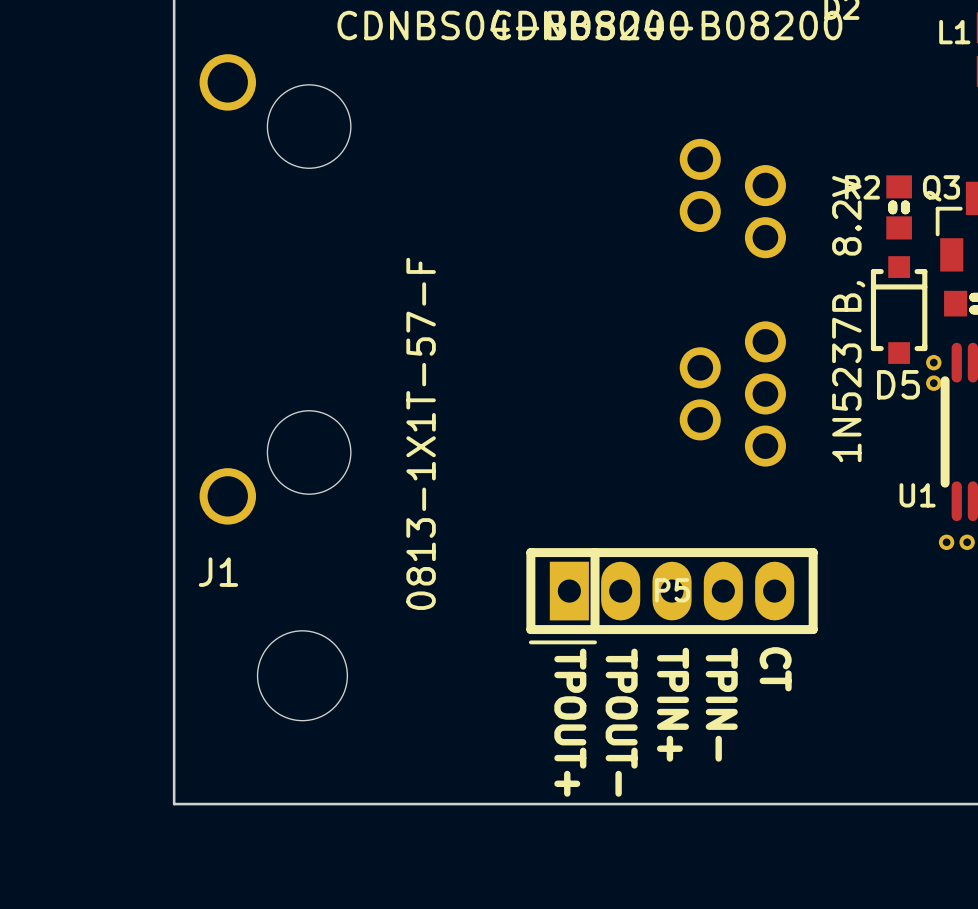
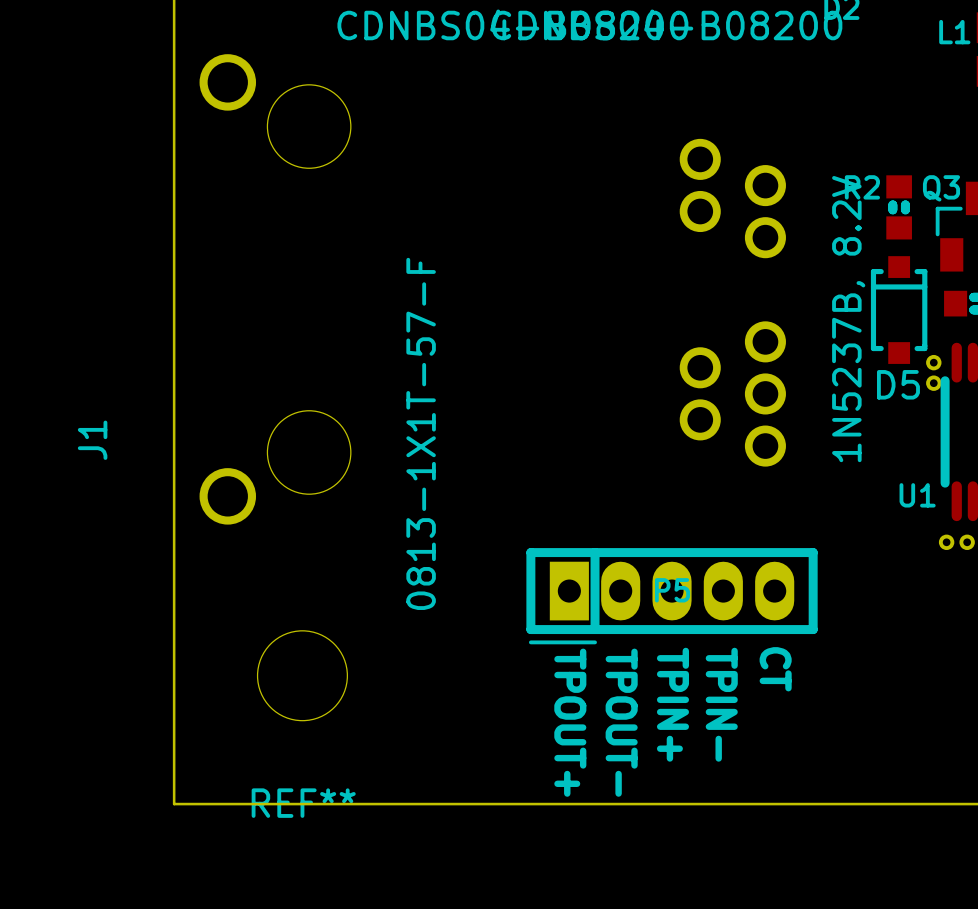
J1 name rotation: 0° (218, 572) -> 90° counterclockwise (92, 440)
J1 name position: J1 (218, 572) -> J1 (92, 440)
REF** name: none -> REF** (303, 803)

